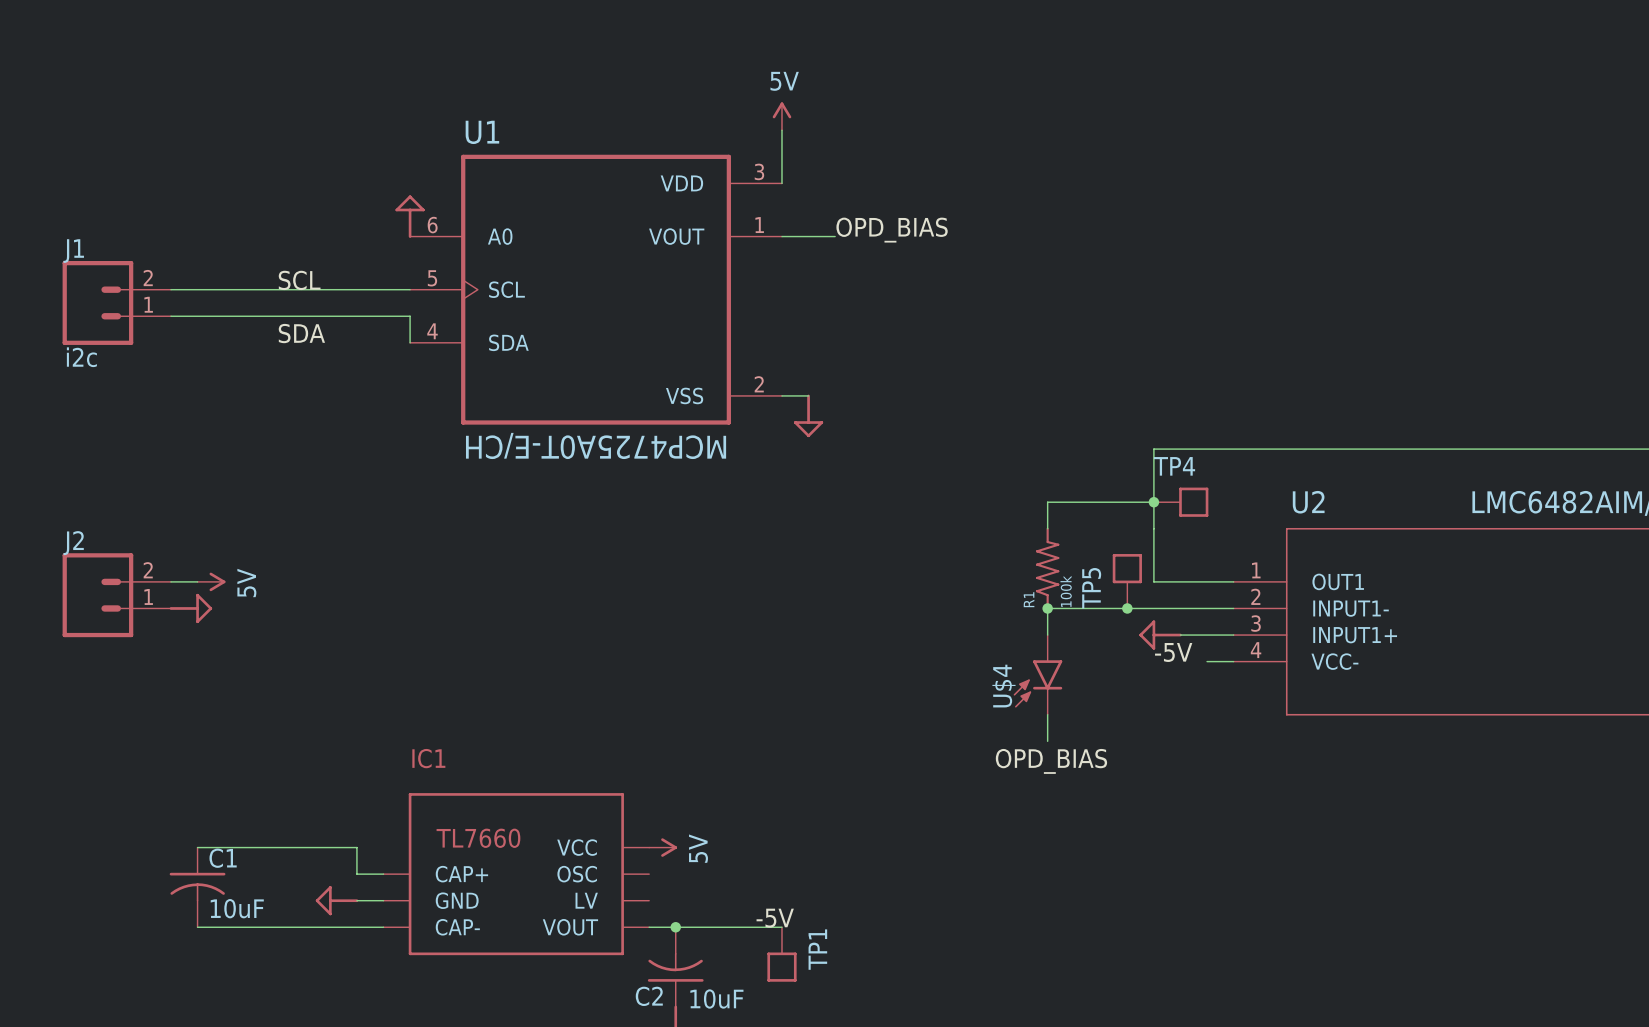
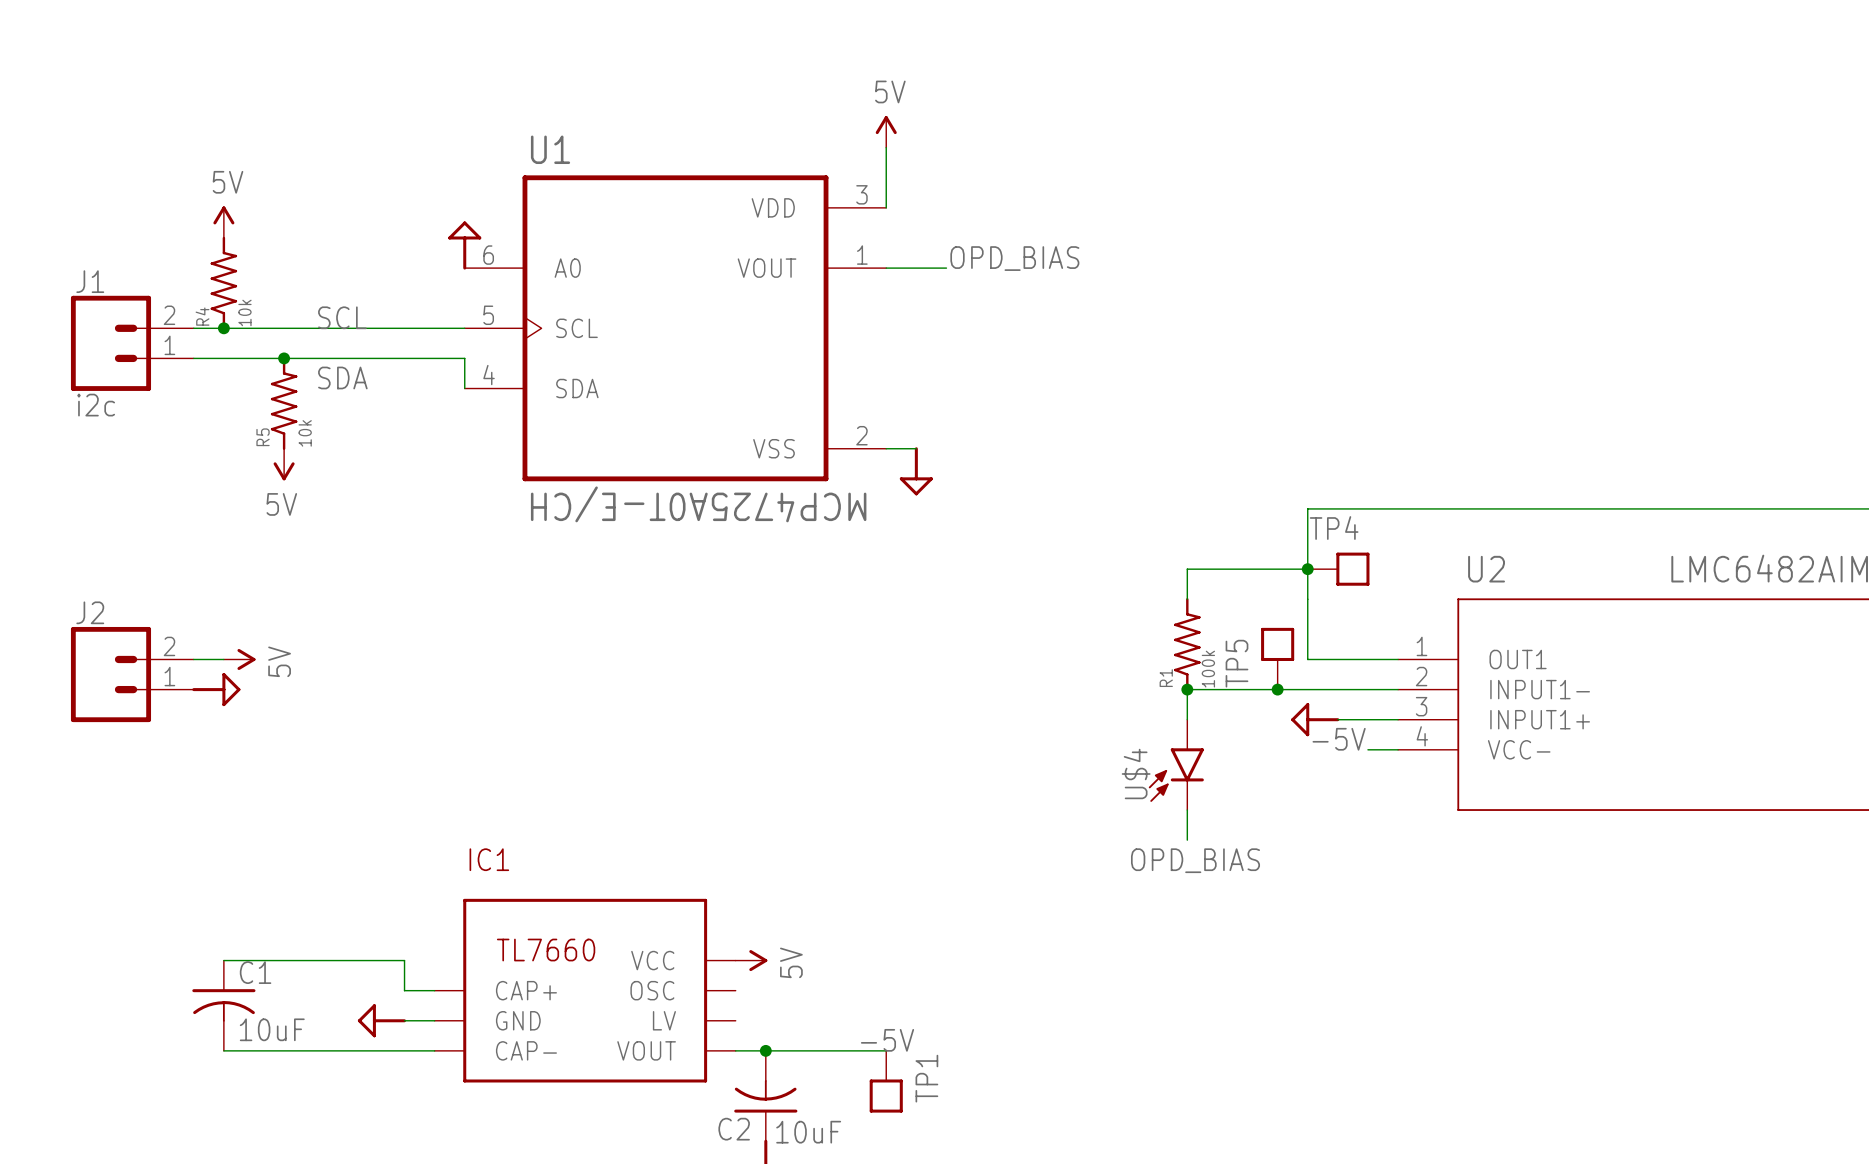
power symbol: none -> 5V (223, 222)
R4: none -> 10k (223, 283)
junction: none -> (223, 328)
junction: none -> (284, 358)
R5: none -> 10k (284, 403)
power symbol: none -> 5V (284, 464)

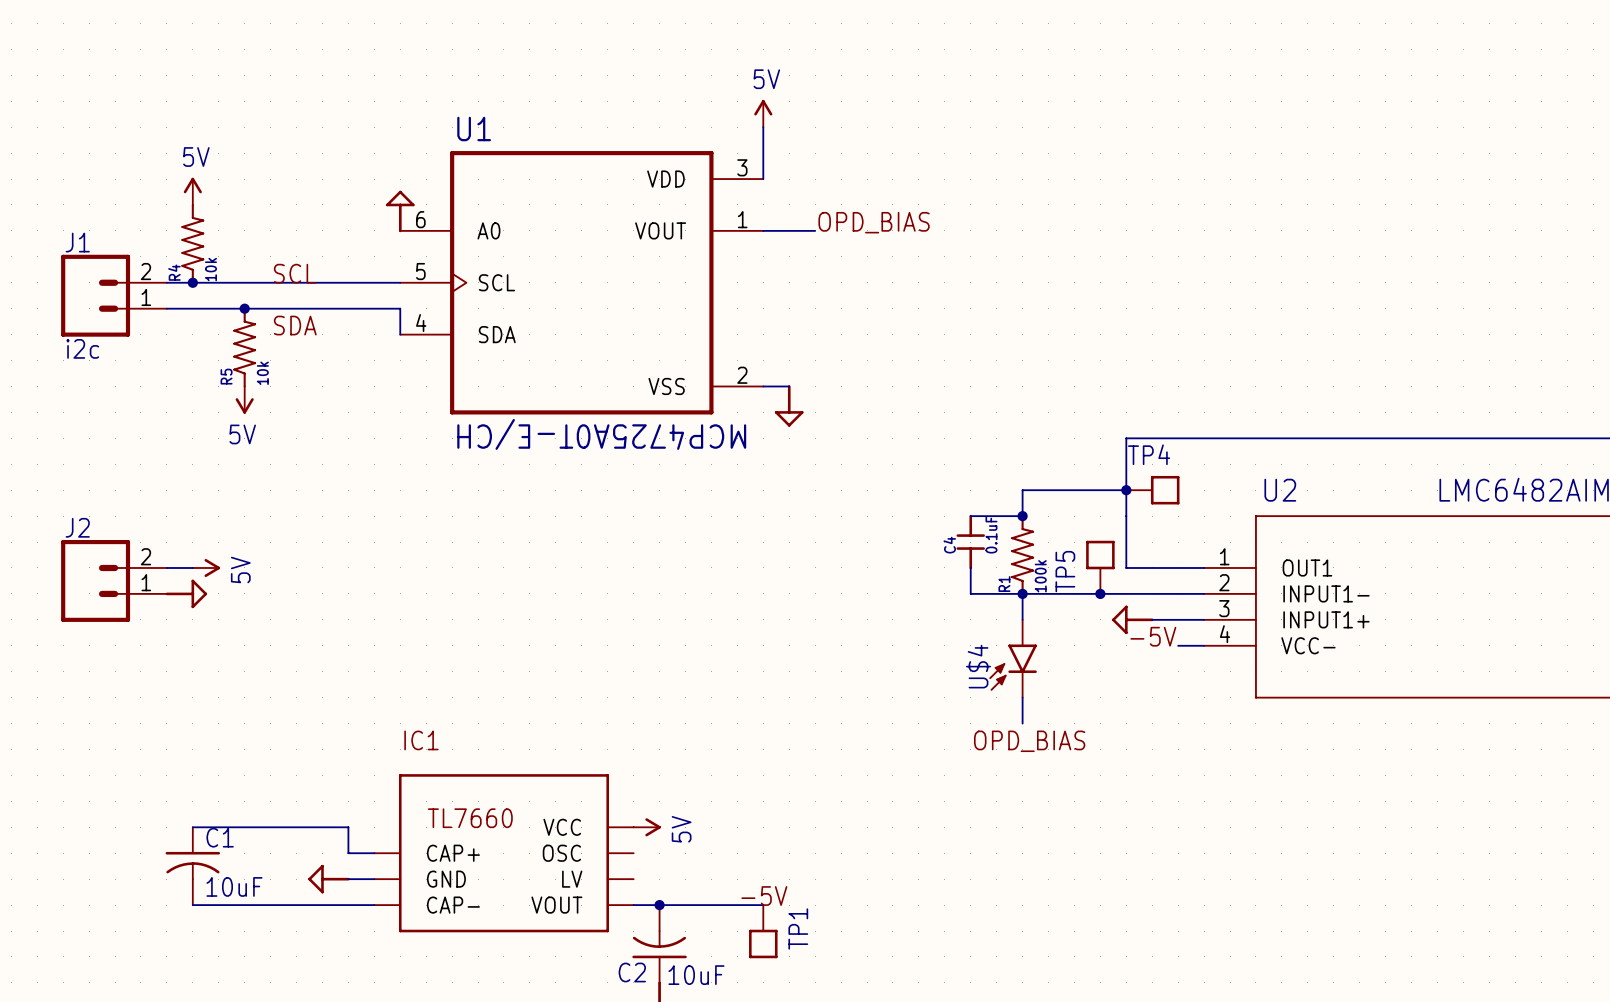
wire: none -> (970, 516) (1022, 516)
junction: none -> (1022, 516)
C4: none -> 0.1uF (970, 542)
wire: none -> (970, 567) (970, 593) (1022, 593)

